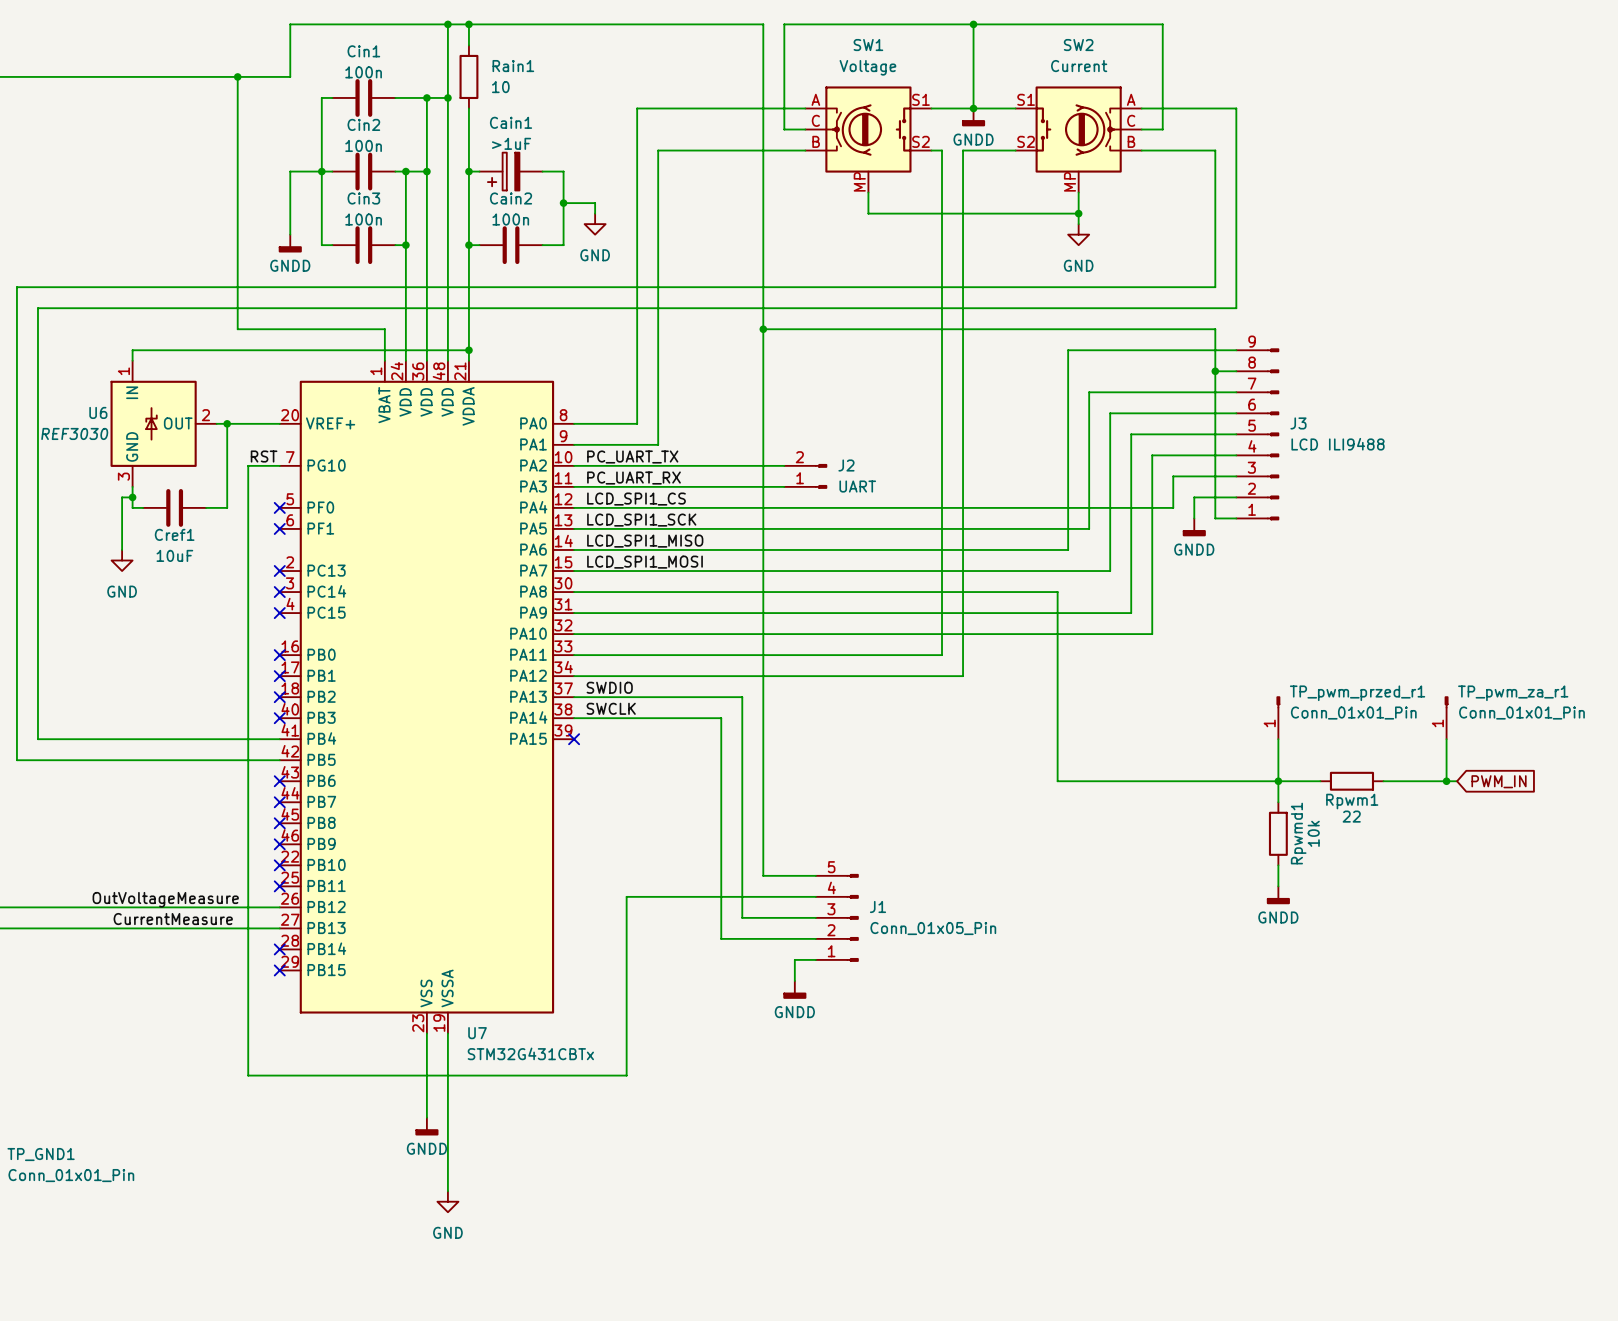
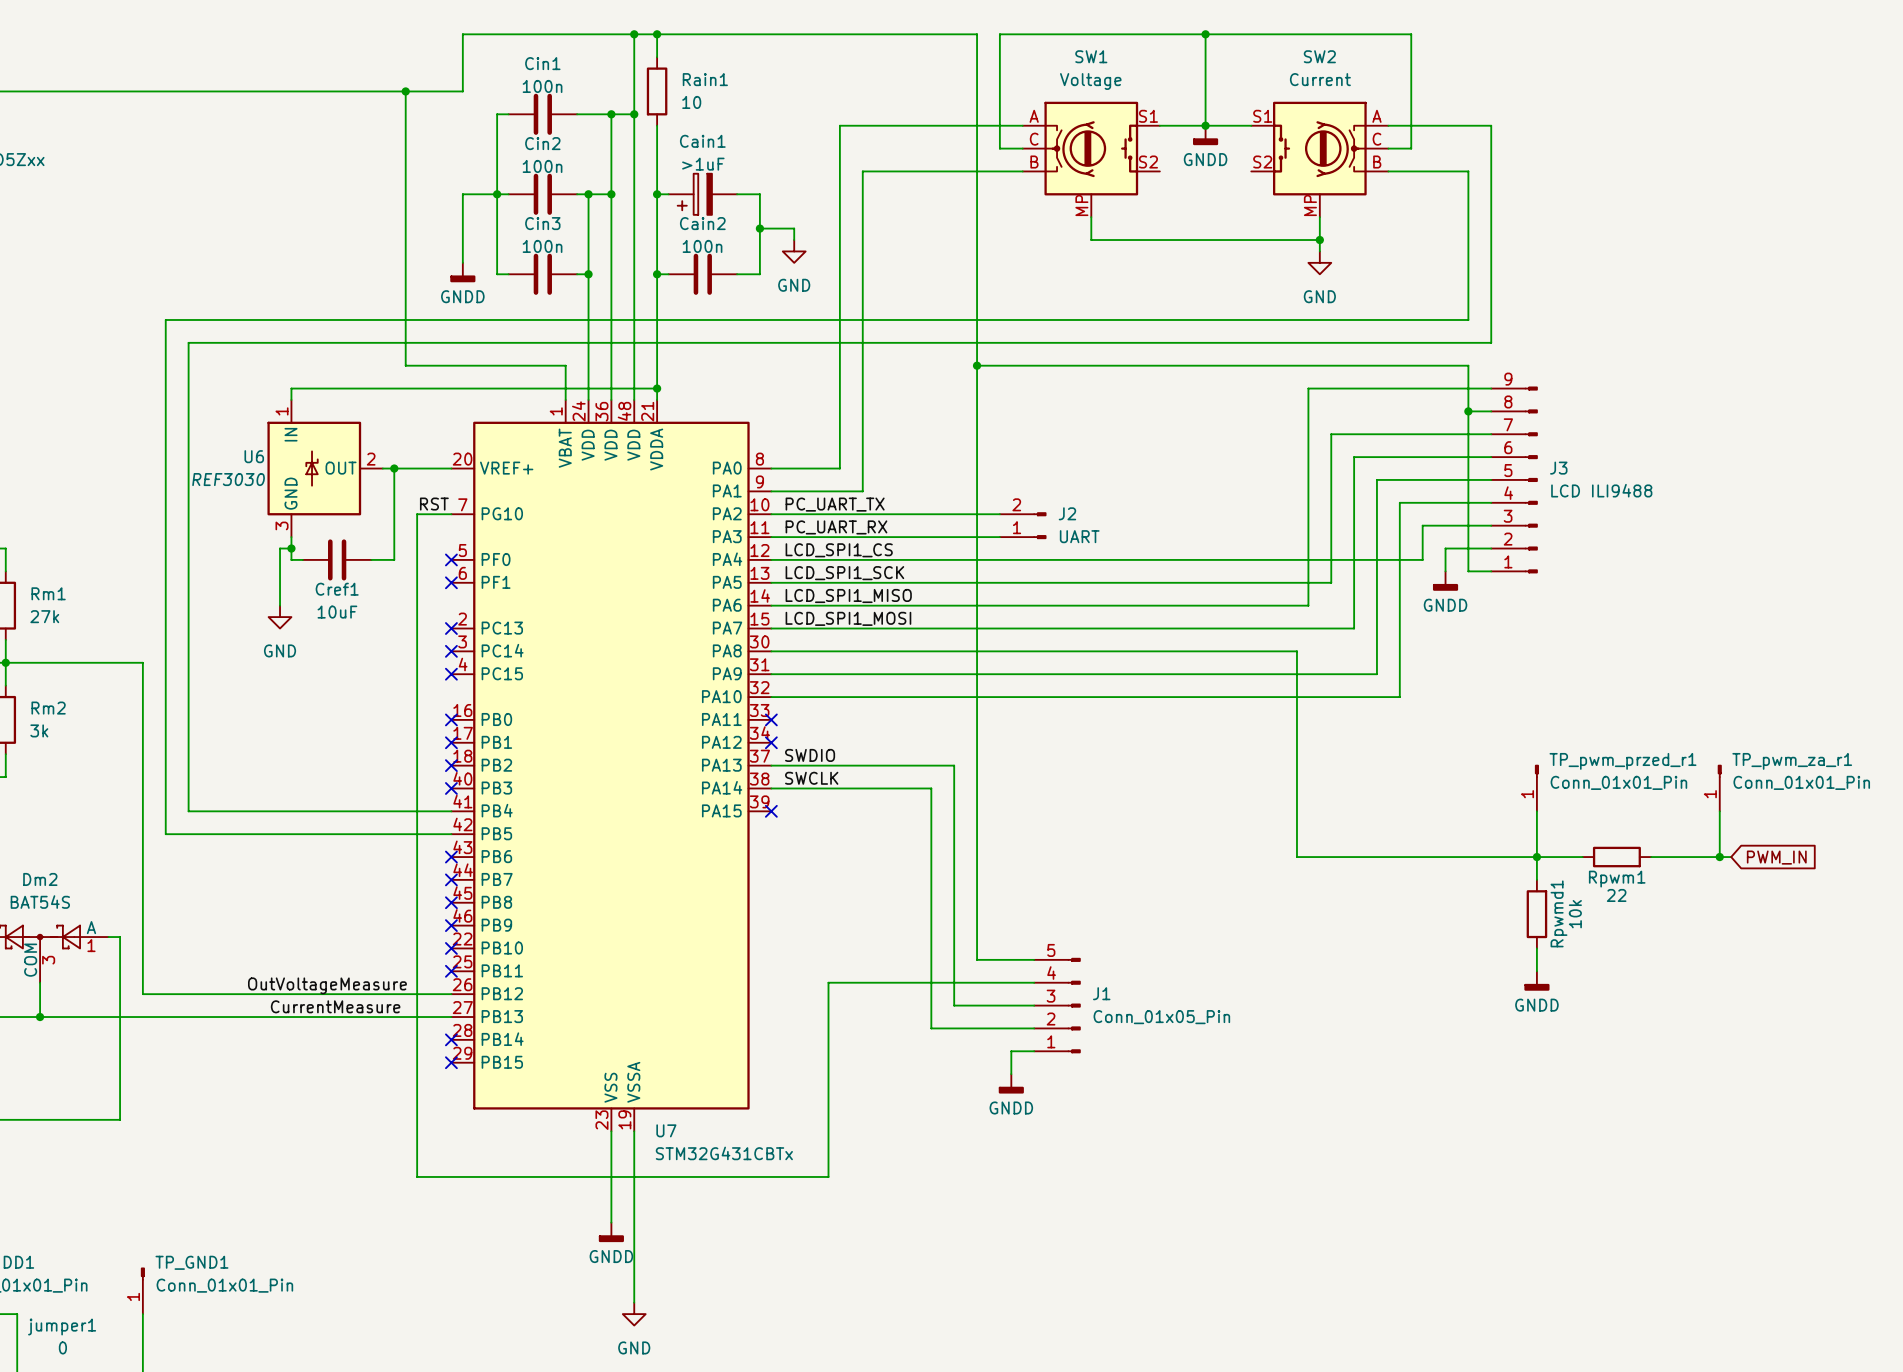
wire: (931, 150) (942, 150) (942, 655) (574, 655) -> none
wire: (1015, 150) (963, 150) (963, 676) (574, 676) -> none
no-connect mark: none -> (771, 719)
no-connect mark: none -> (771, 742)

